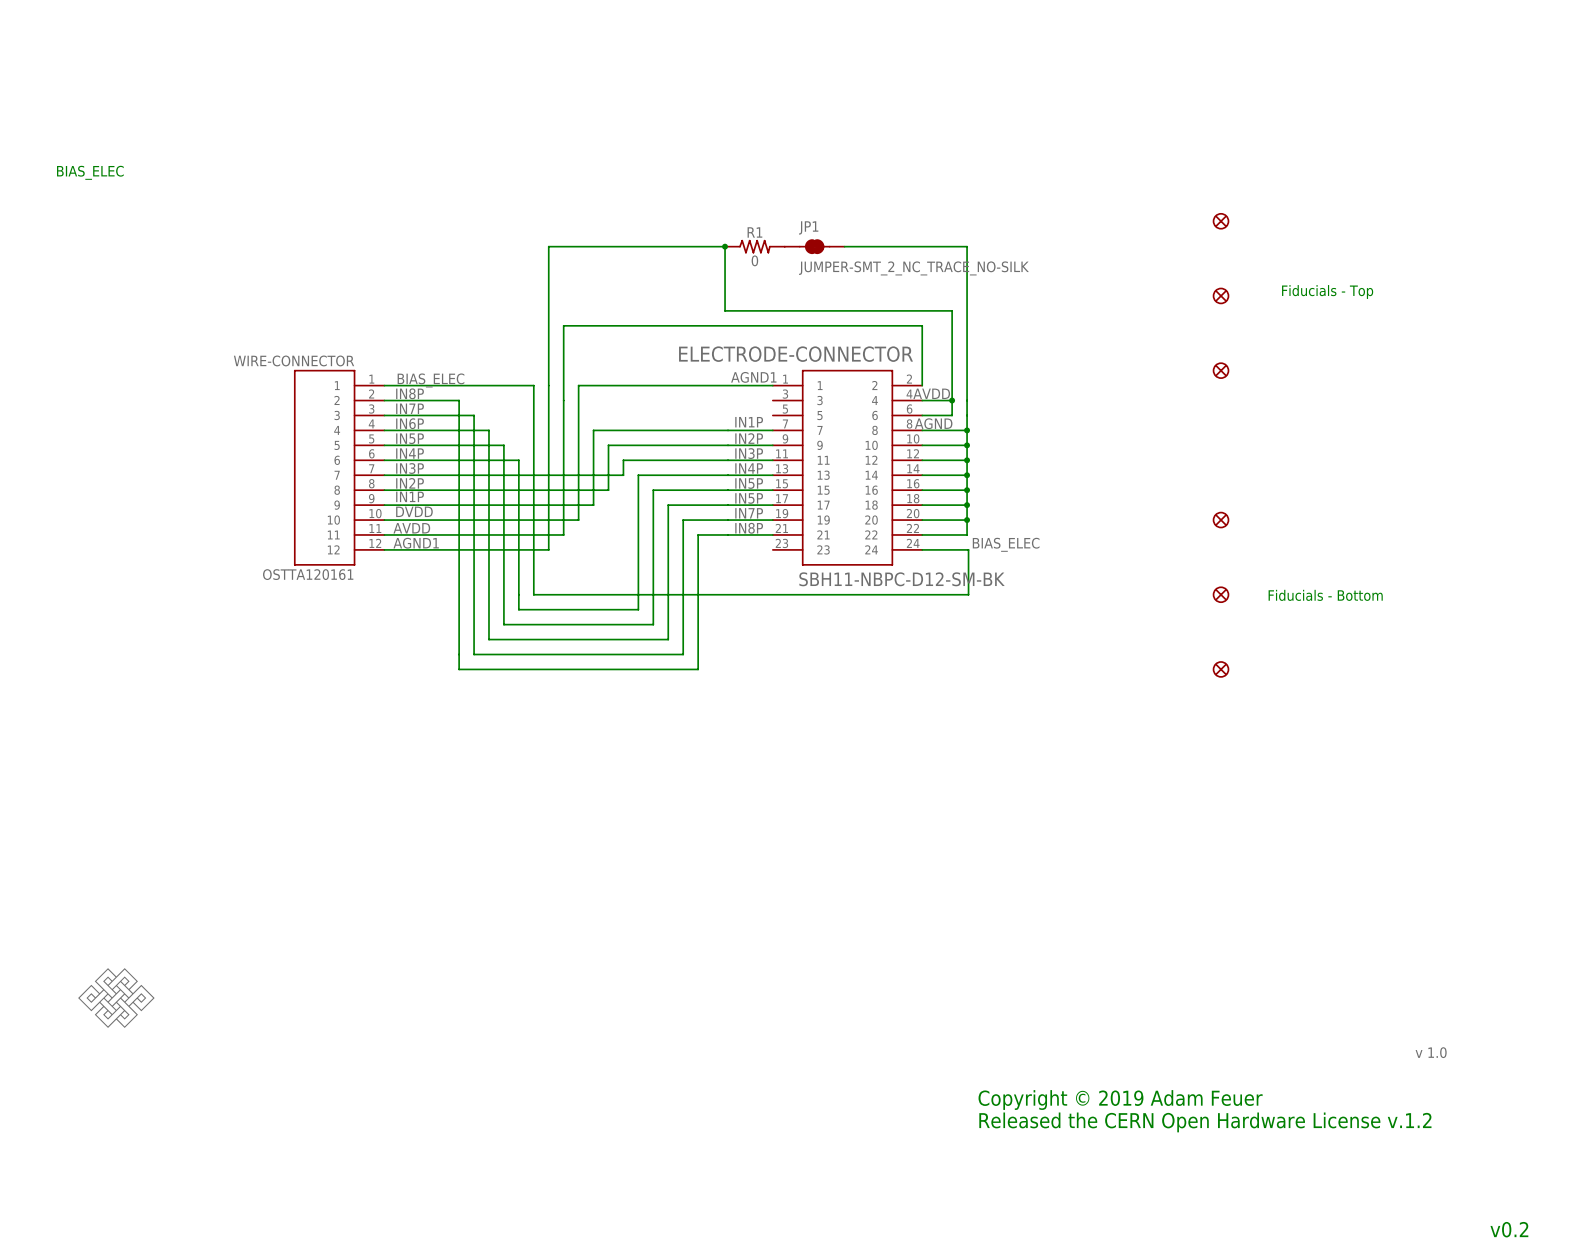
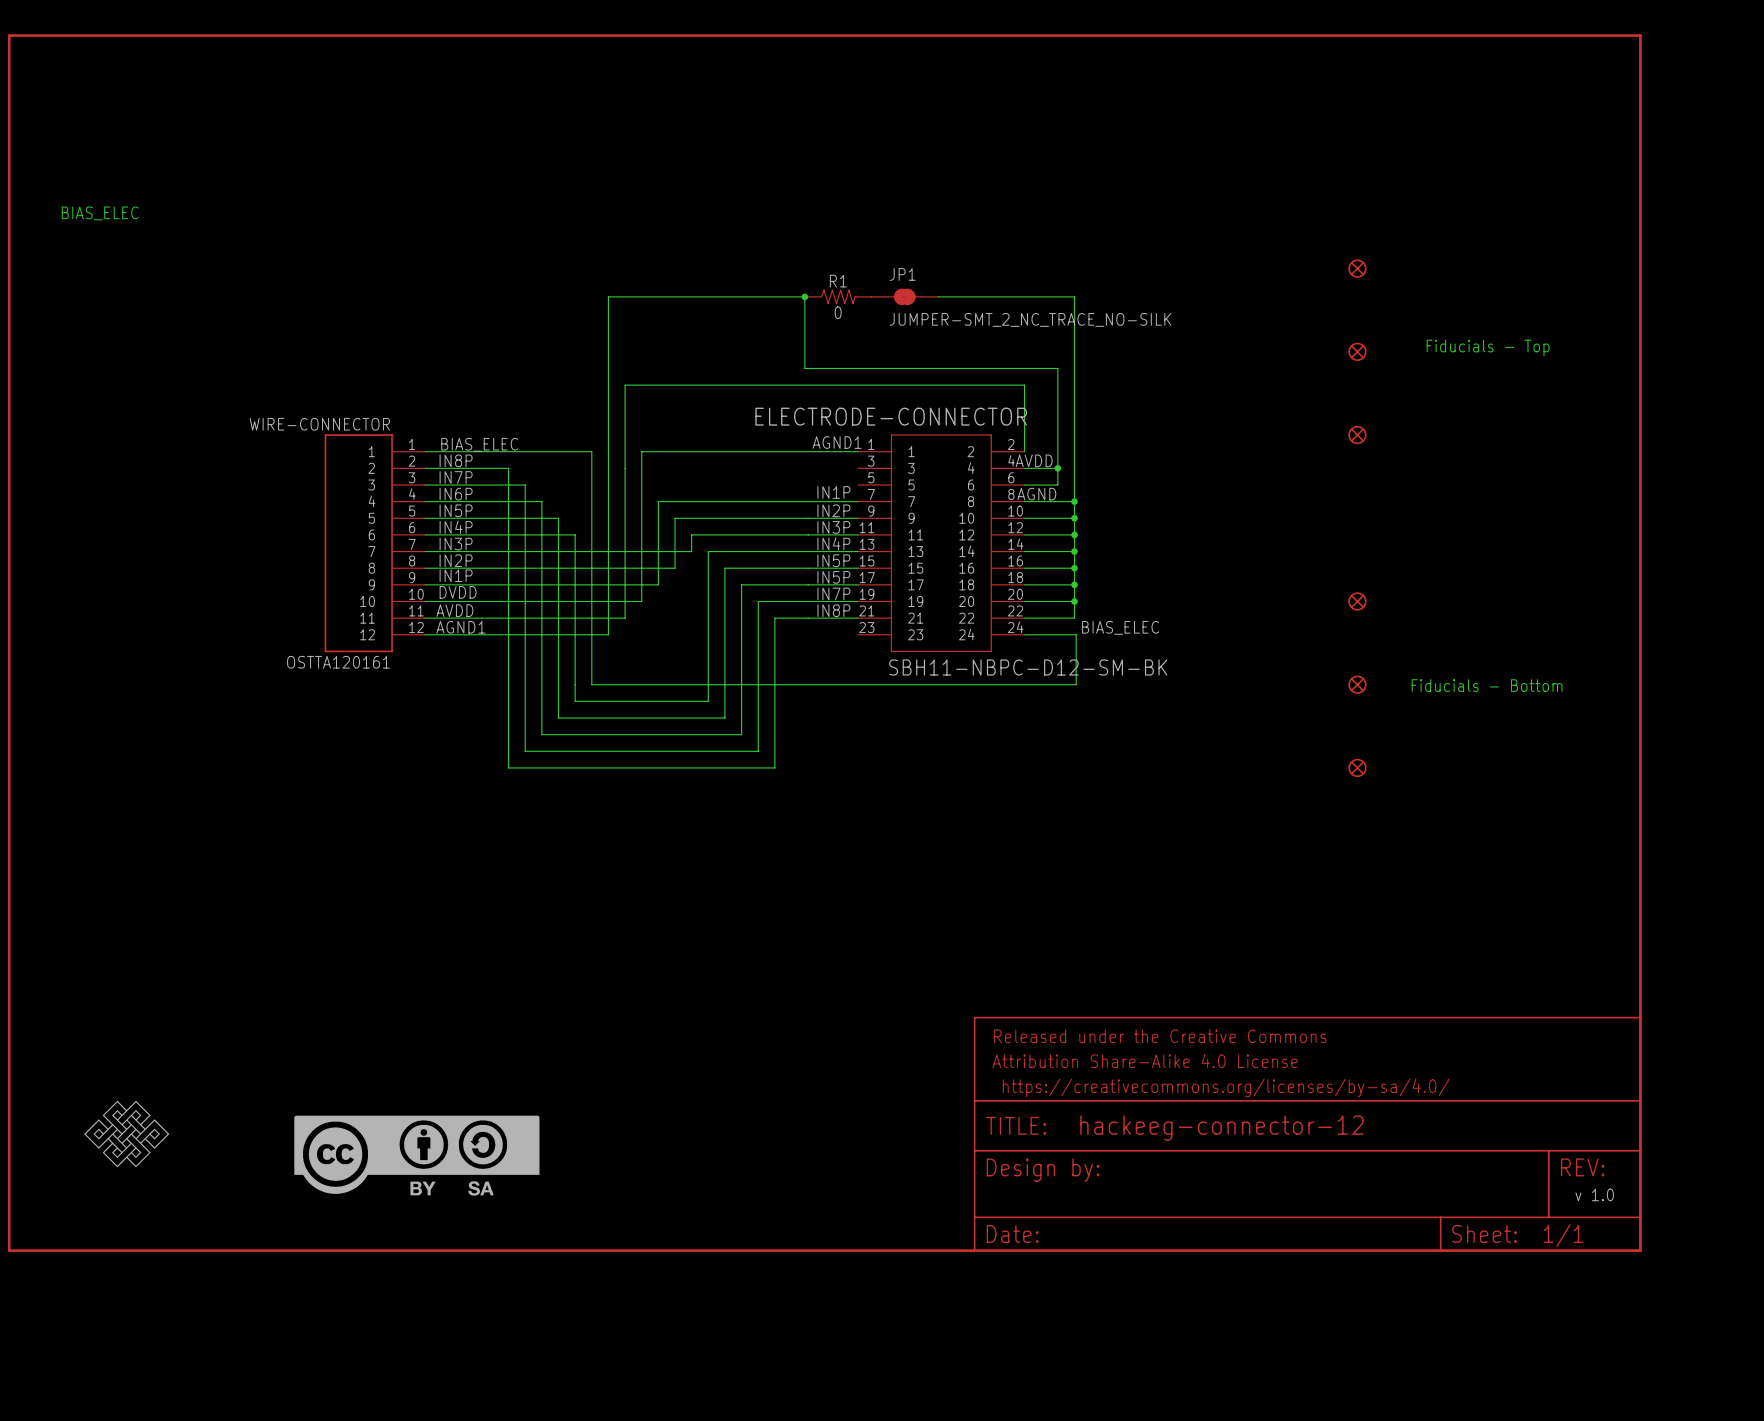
part: none -> (824, 643)
part: none -> (1307, 1134)
part: none -> (416, 1155)
text: Copyright © 2019 Adam Feuer (1120, 1100) -> none
text: Released the CERN Open Hardware License v.1.2 (1205, 1122) -> none
text: v0.2 (1509, 1229) -> none

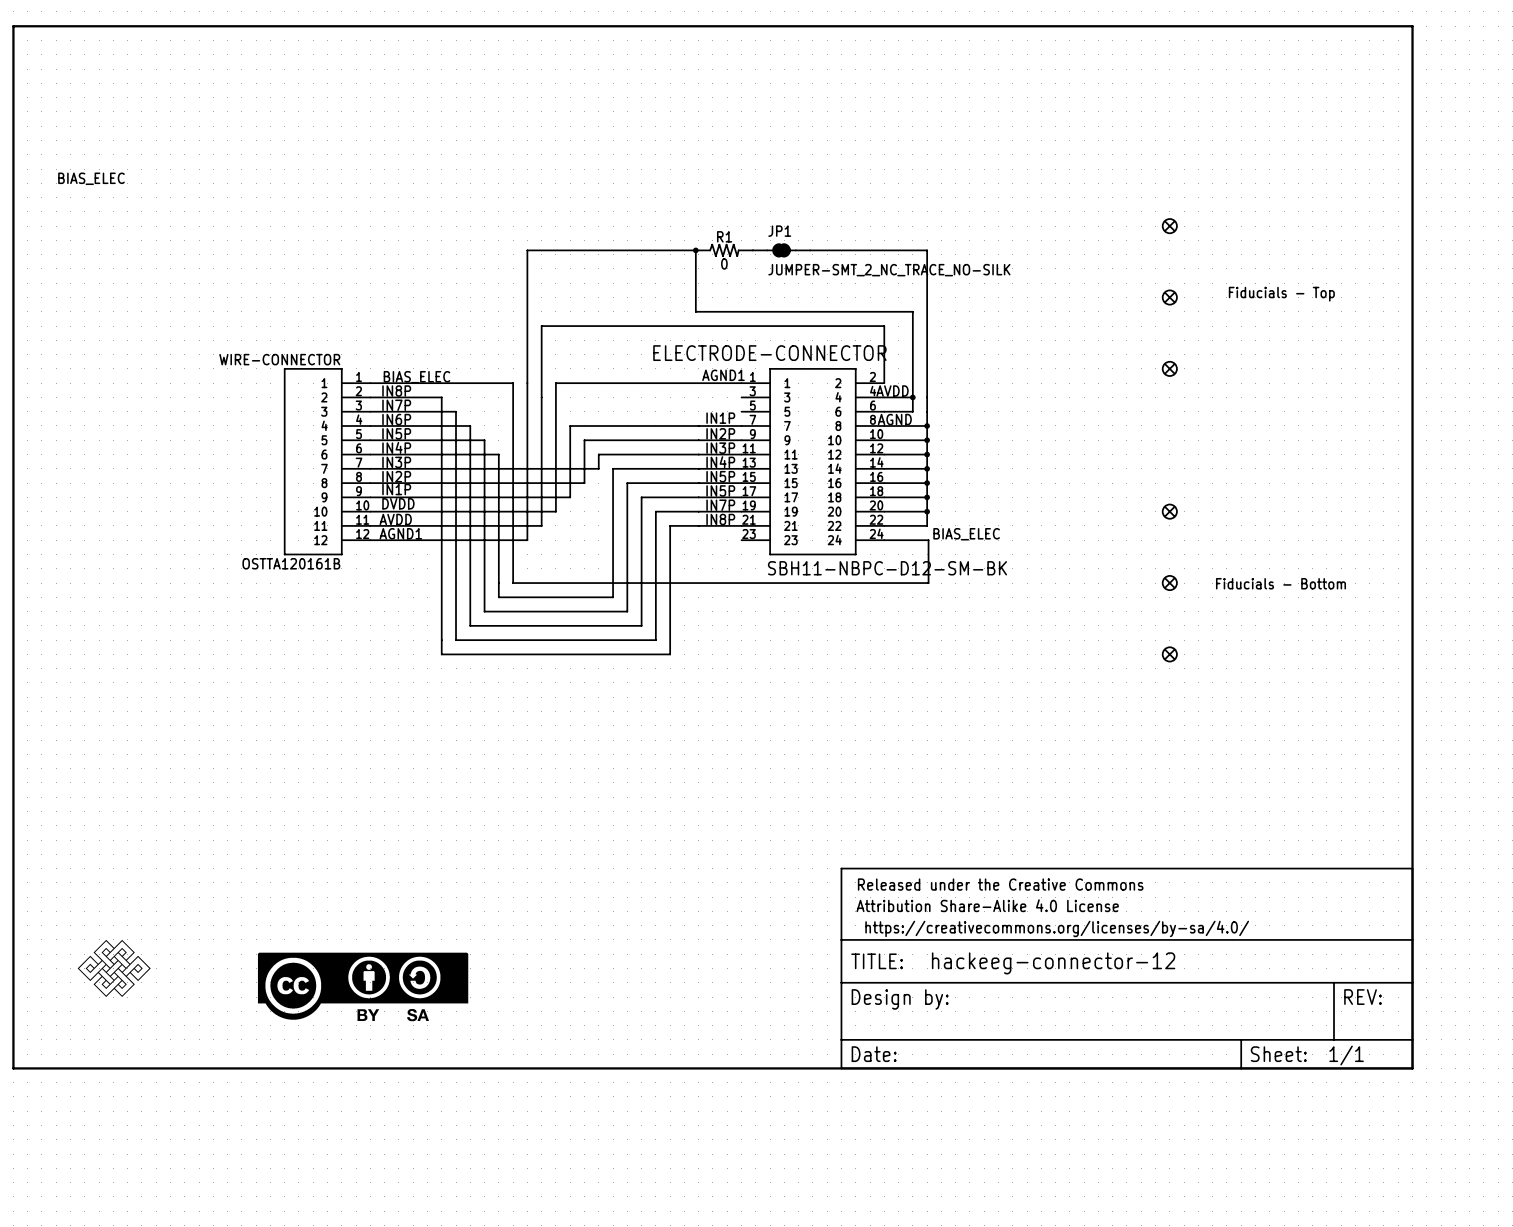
WIRE-CONNECTOR value: OSTTA120161 (338, 662) -> OSTTA120161B (291, 563)
text: v 1.0 (1594, 1194) -> none

